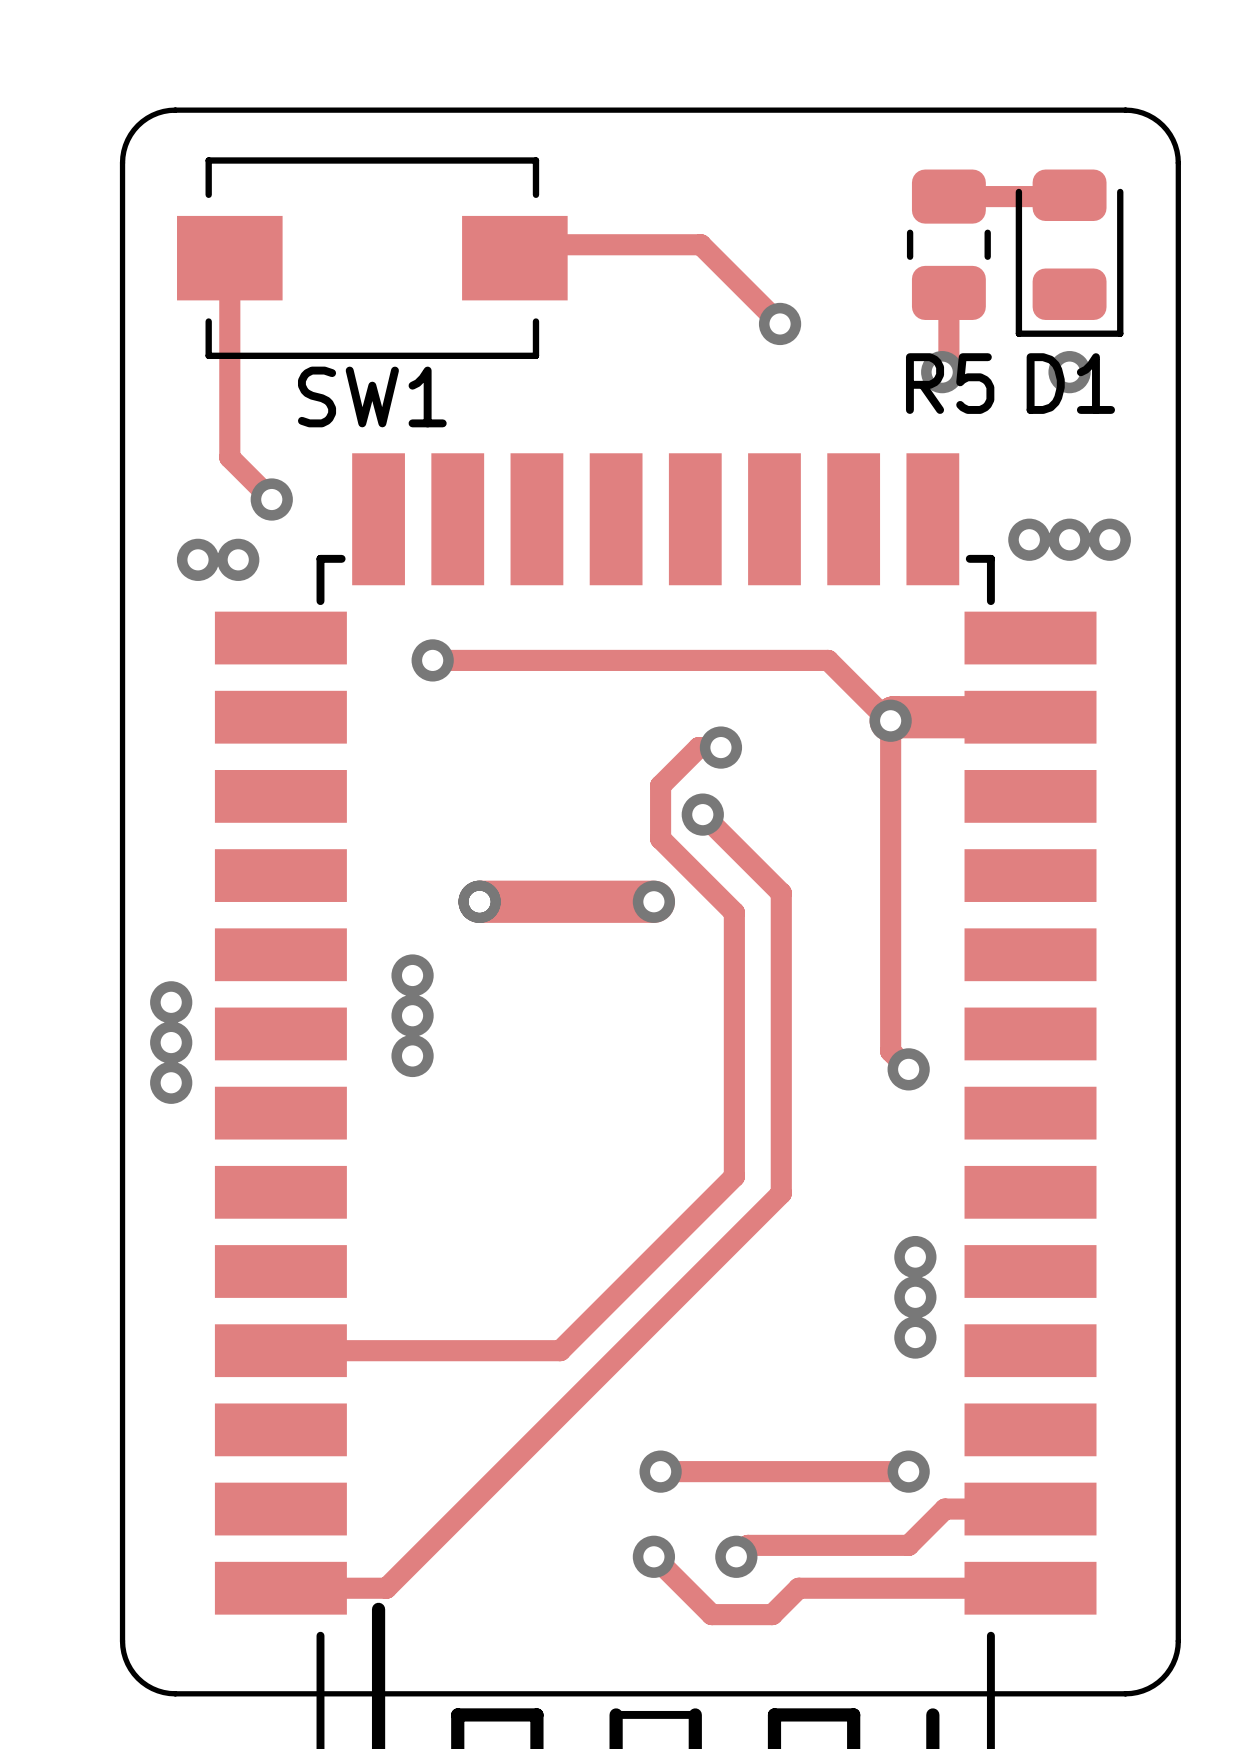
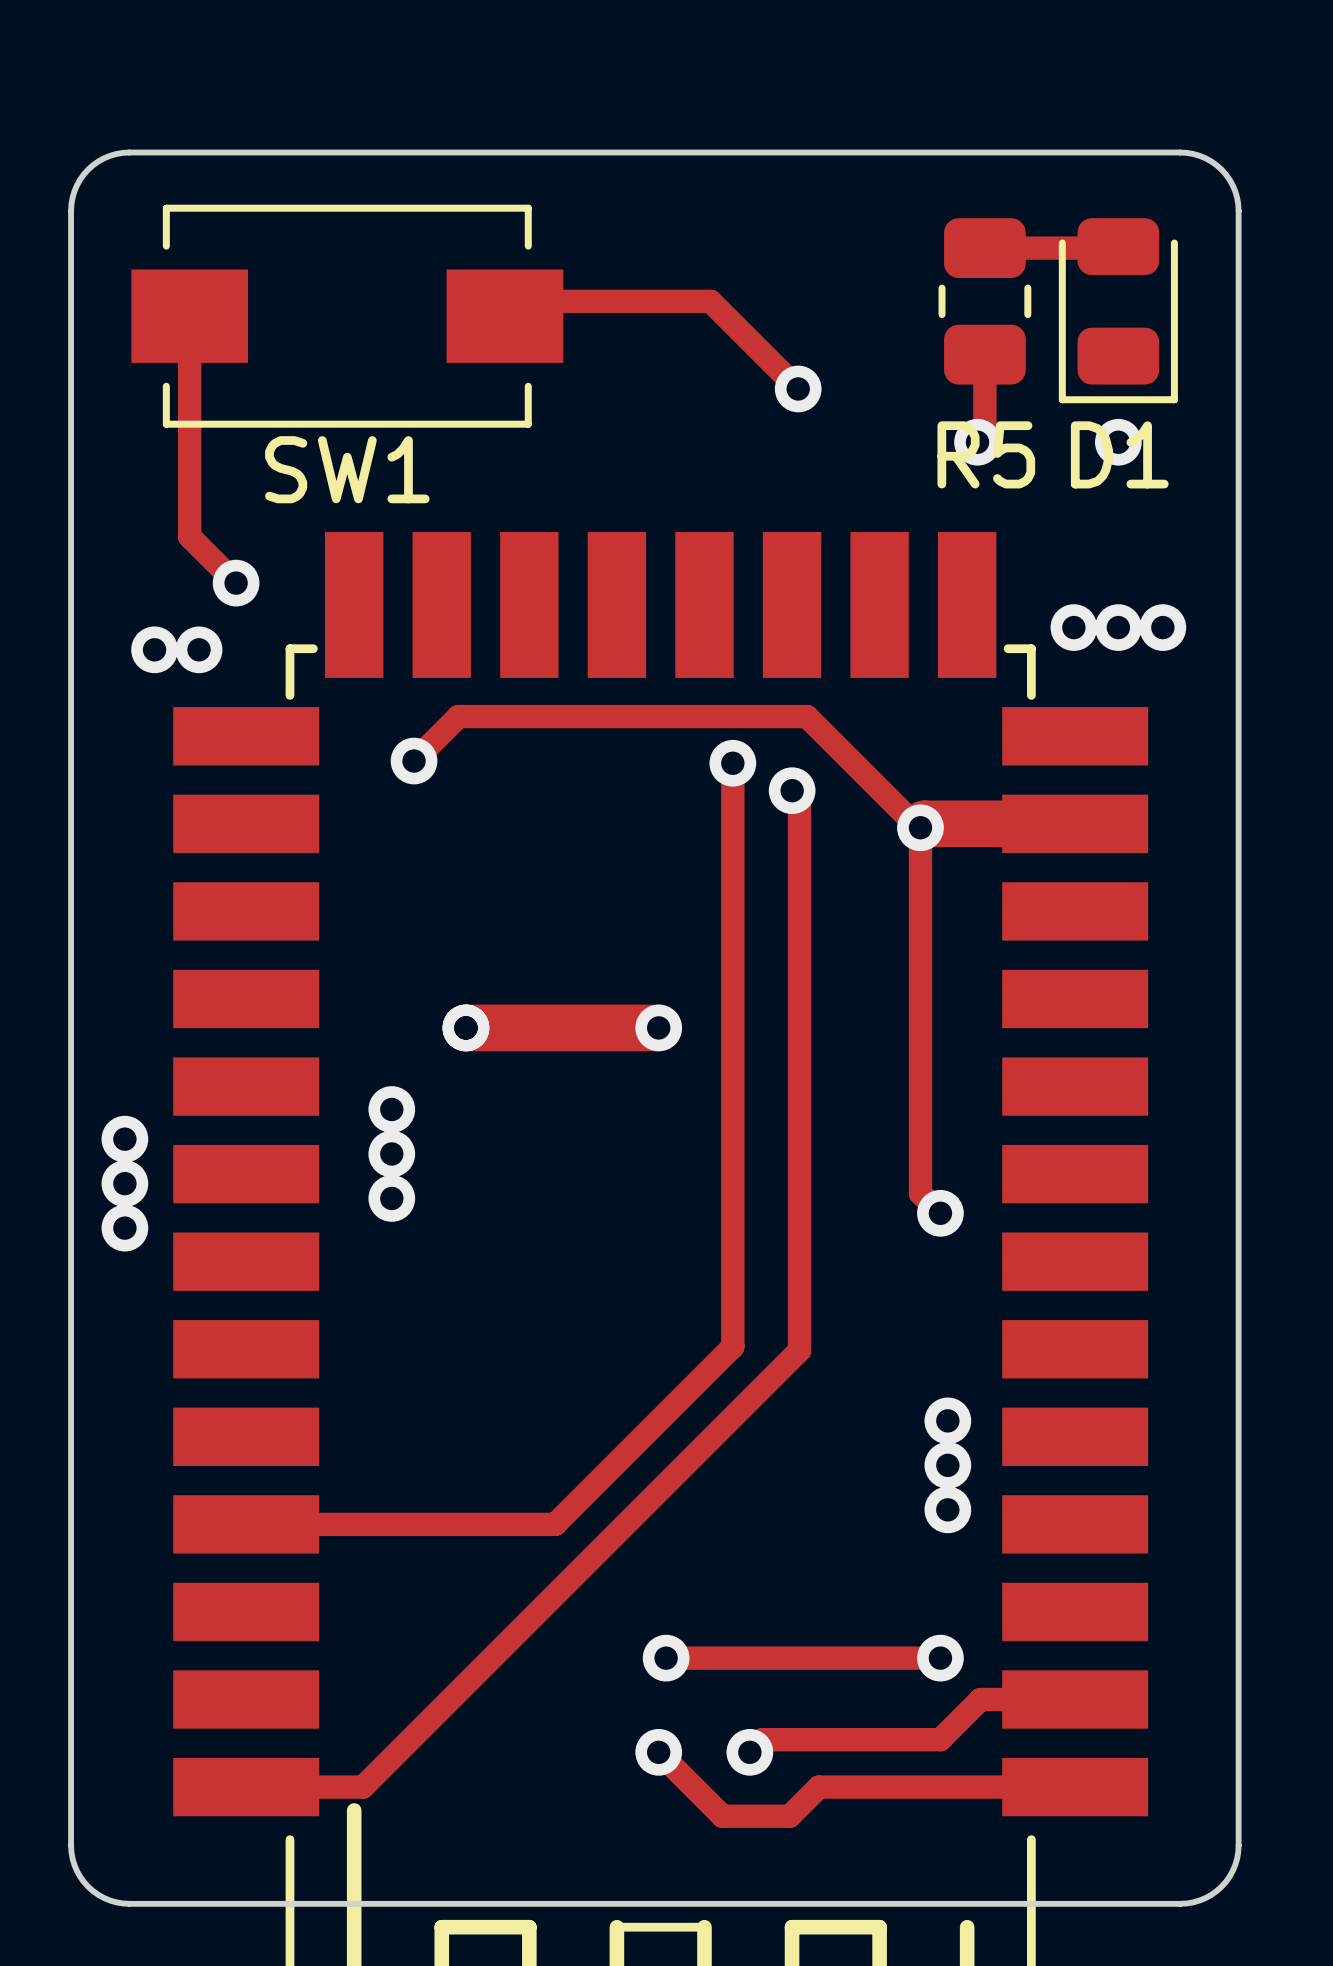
track: (432, 660) (828, 660) -> (414, 761) (458, 716) (806, 716) (851, 761)
via: none -> (732, 763)
via: none -> (792, 790)
track: (720, 747) (698, 747) (660, 785) (660, 838) (734, 912) (734, 1176) (720, 1190) -> (732, 763) (732, 1346)
via: (720, 747) -> none
track: (702, 814) (781, 893) -> (792, 790) (799, 798) (799, 1018)
via: (702, 814) -> none

